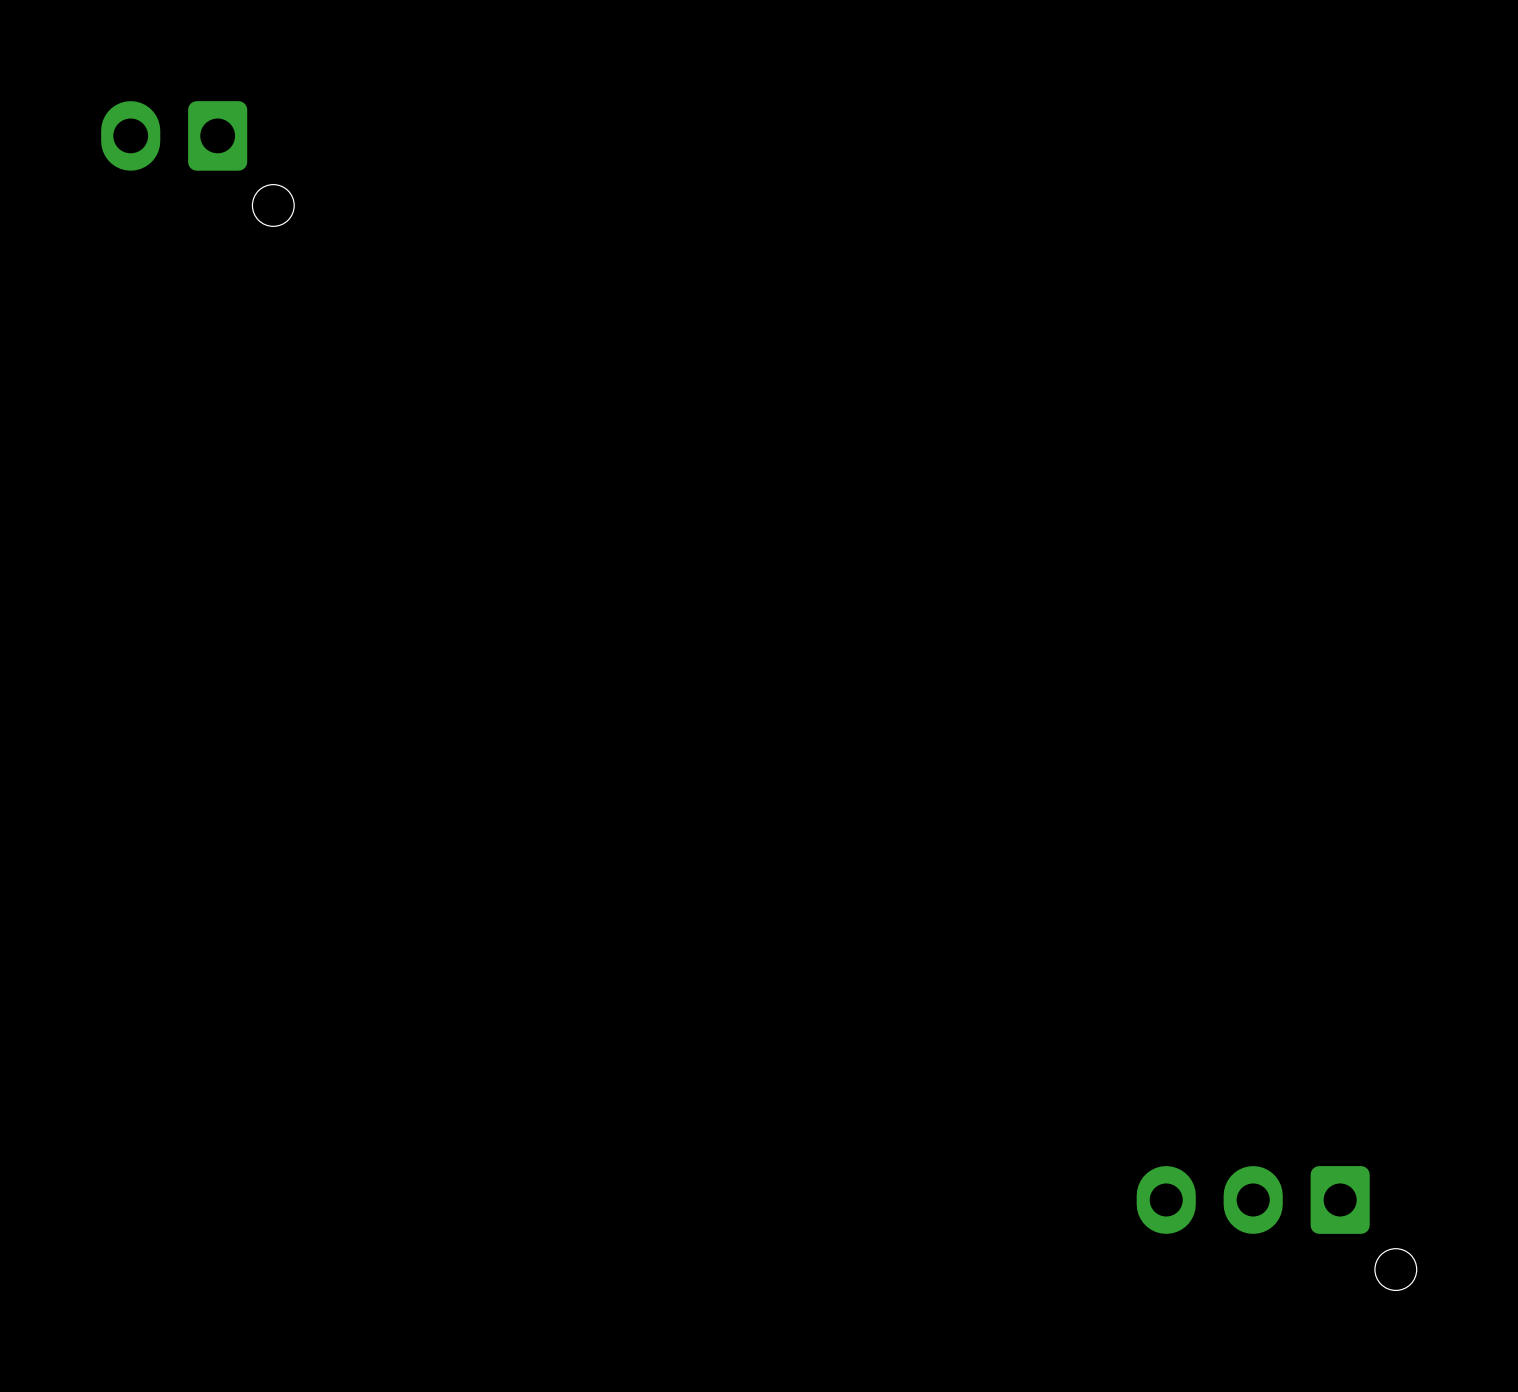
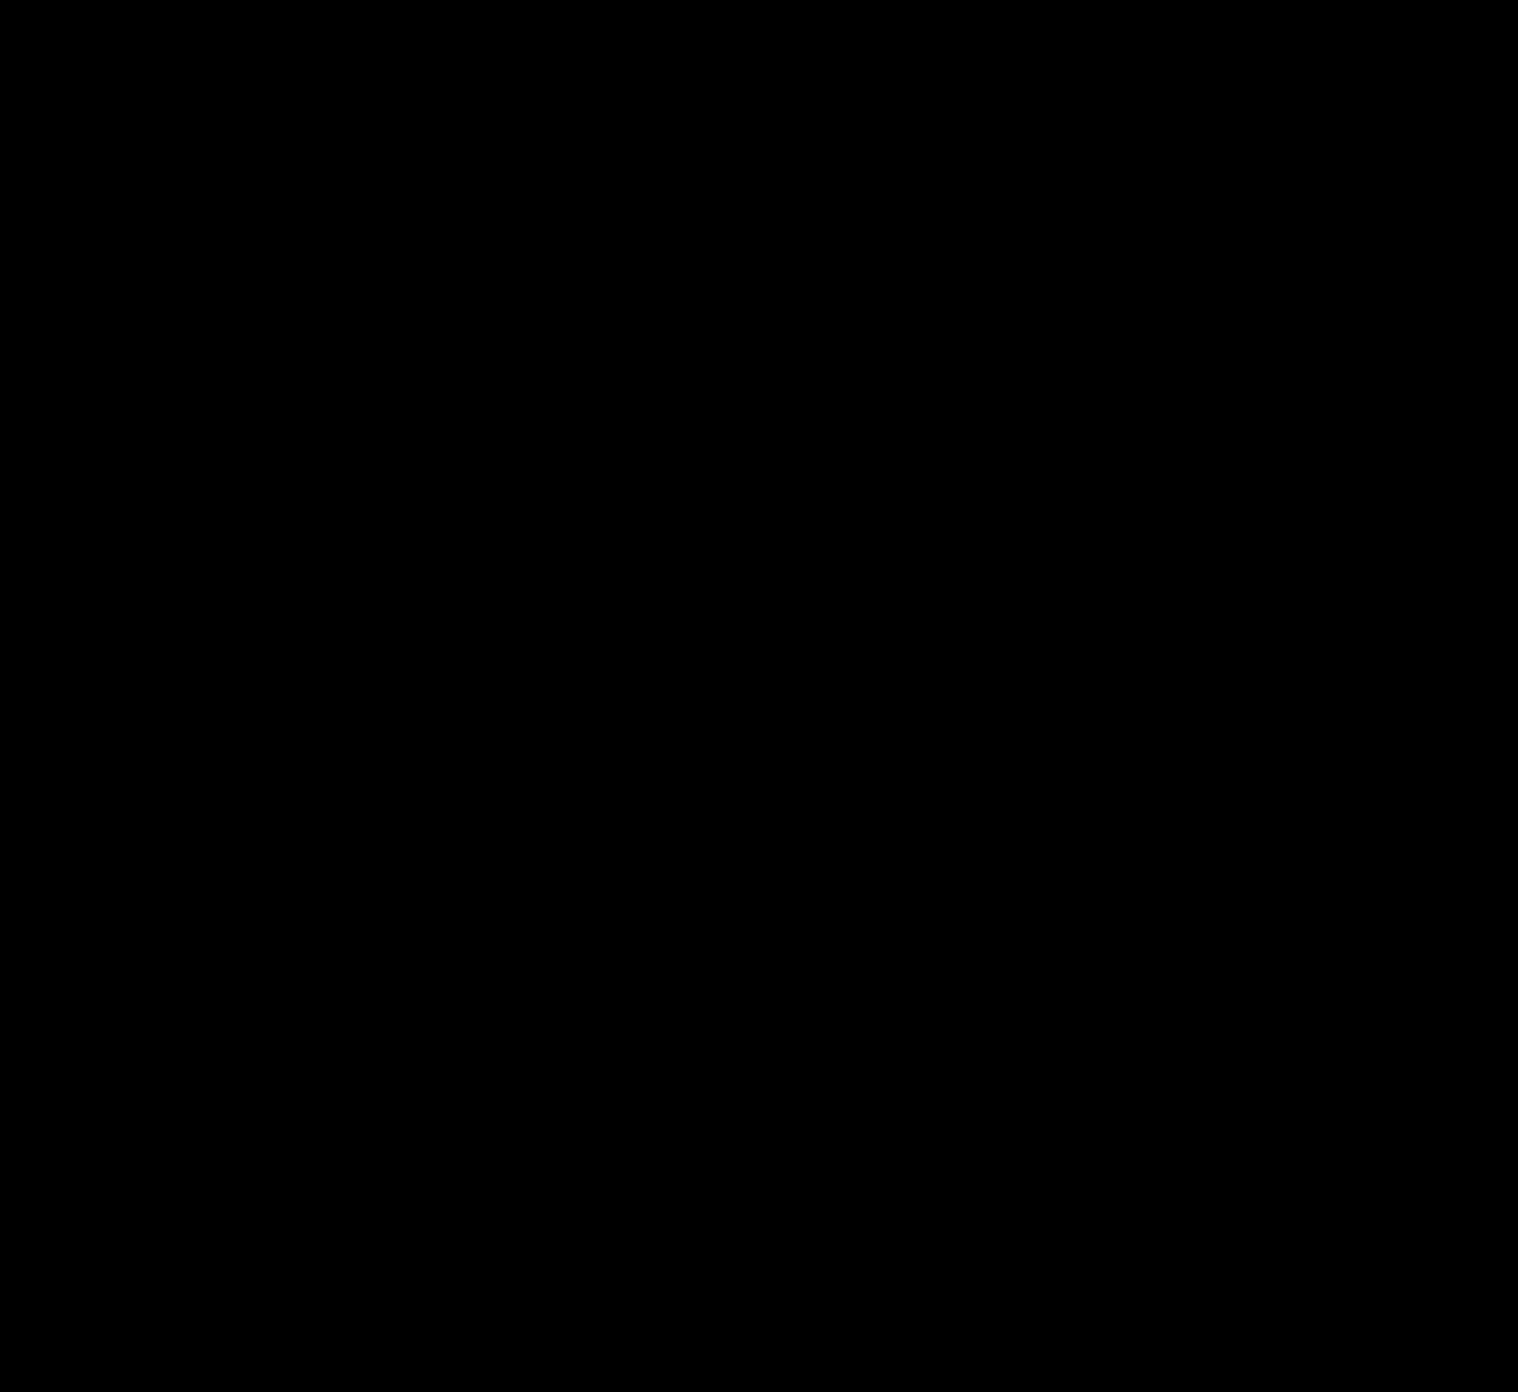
part: (197, 163) -> none
part: (1276, 1228) -> none

